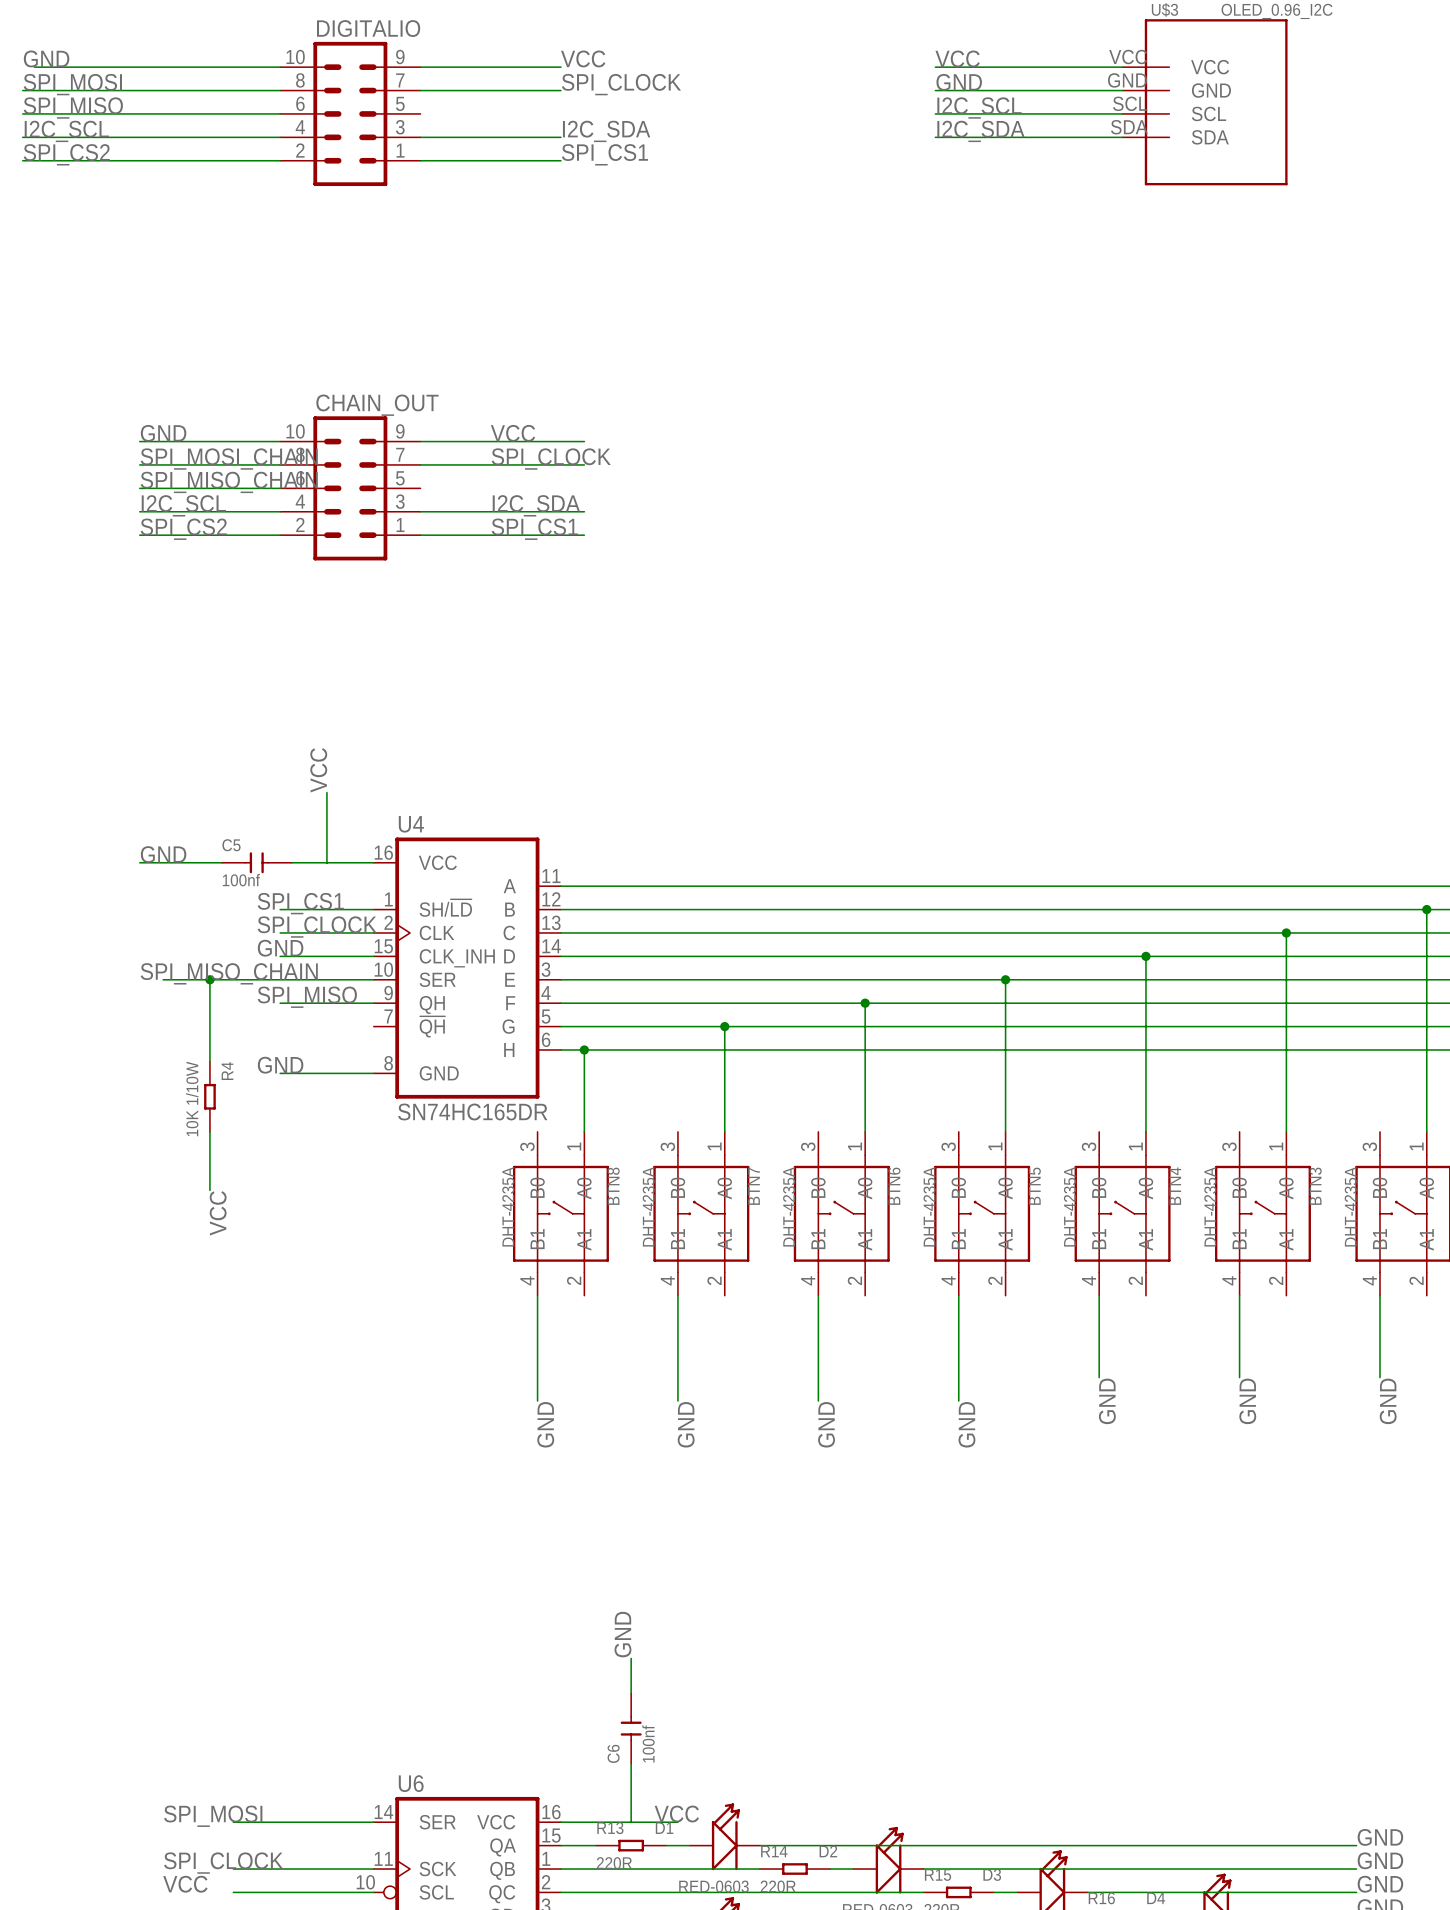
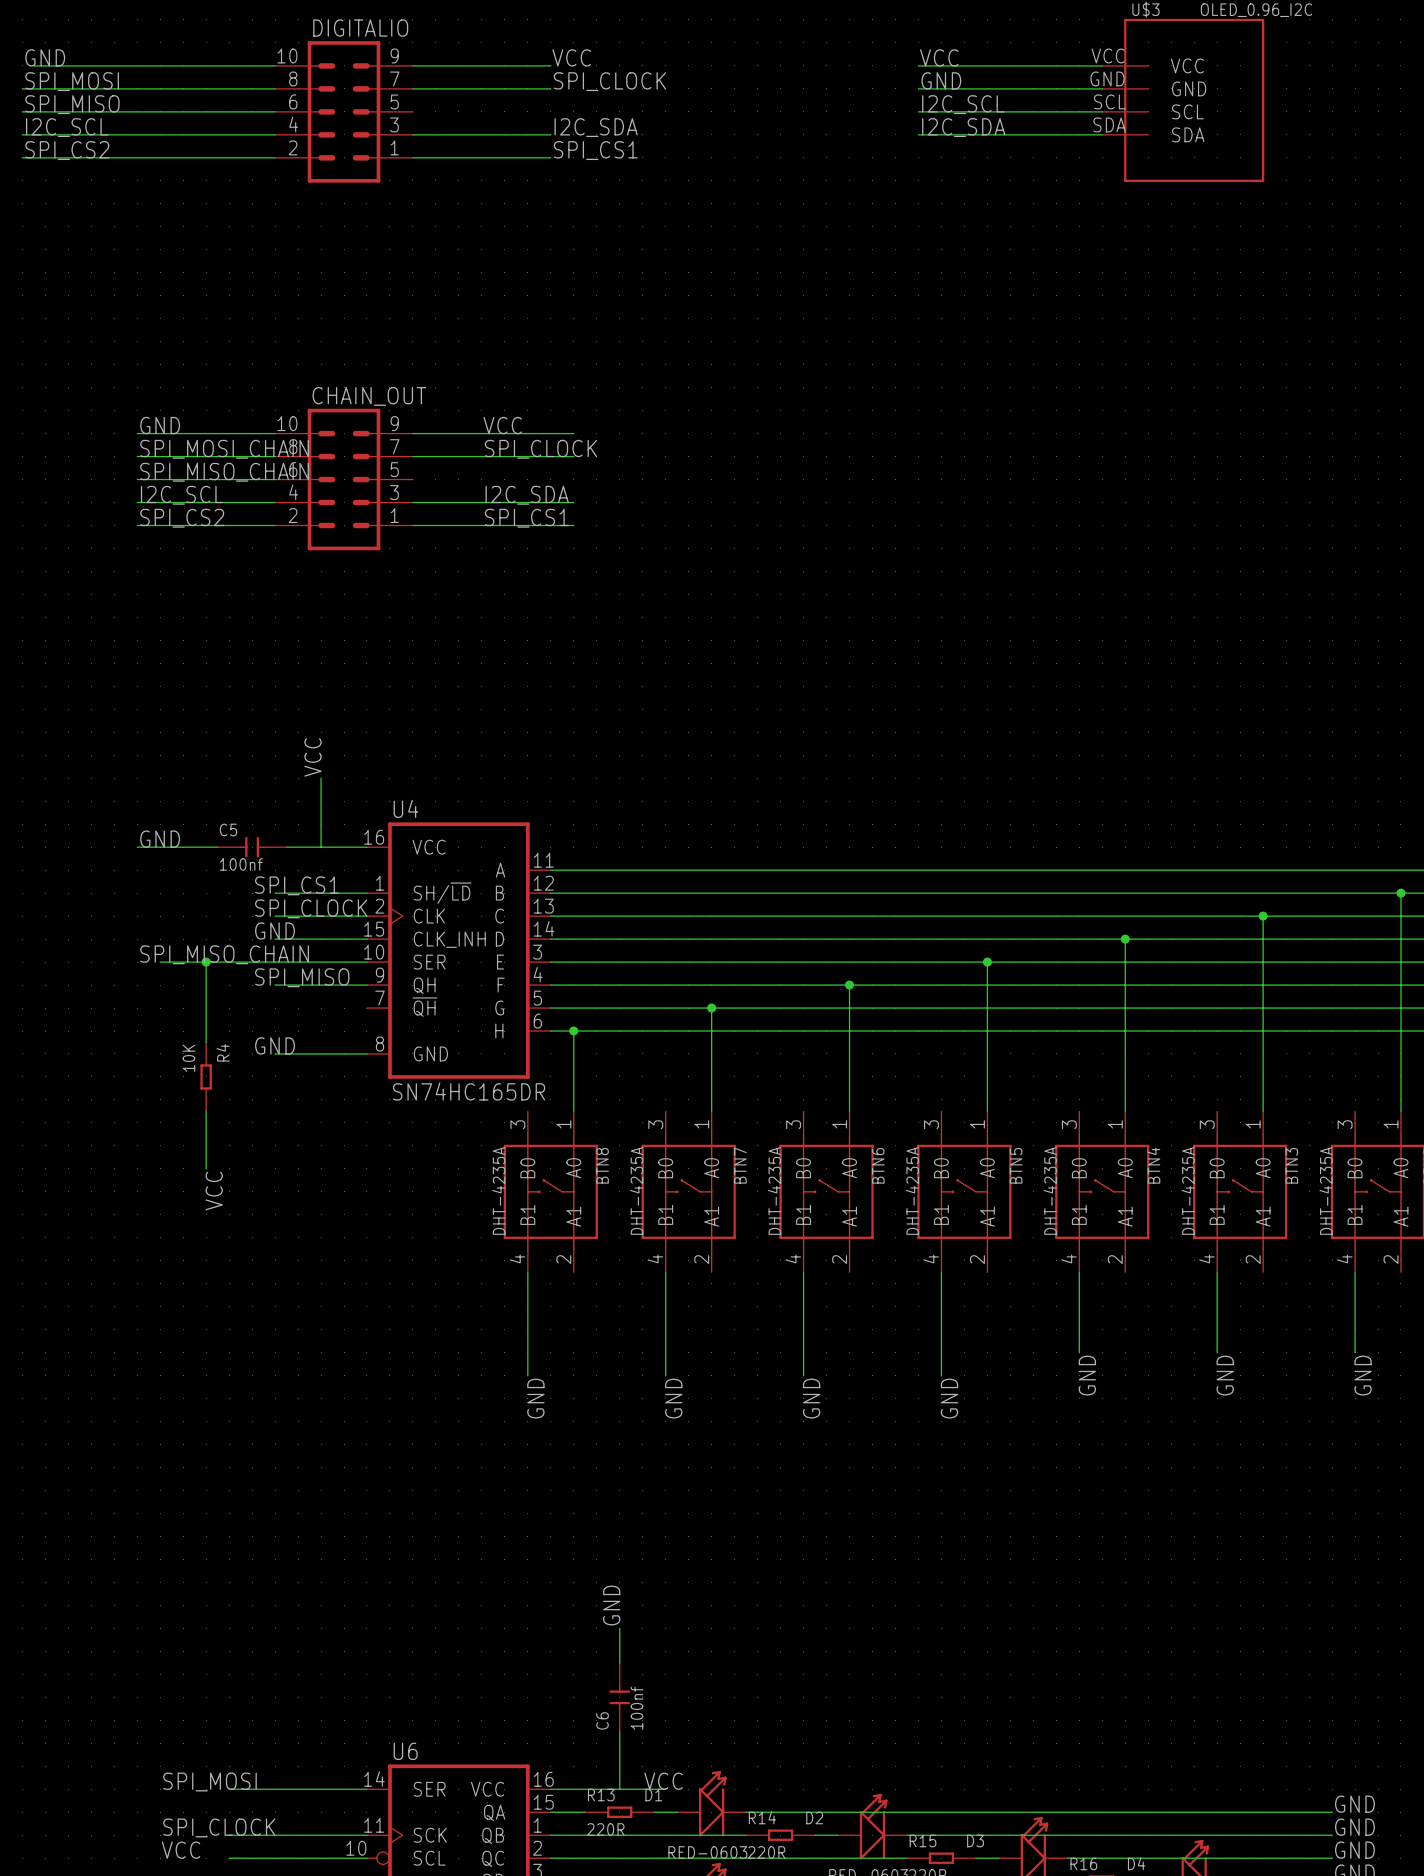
R4 value: 10K 1/10W (192, 1098) -> 10K (188, 1058)

